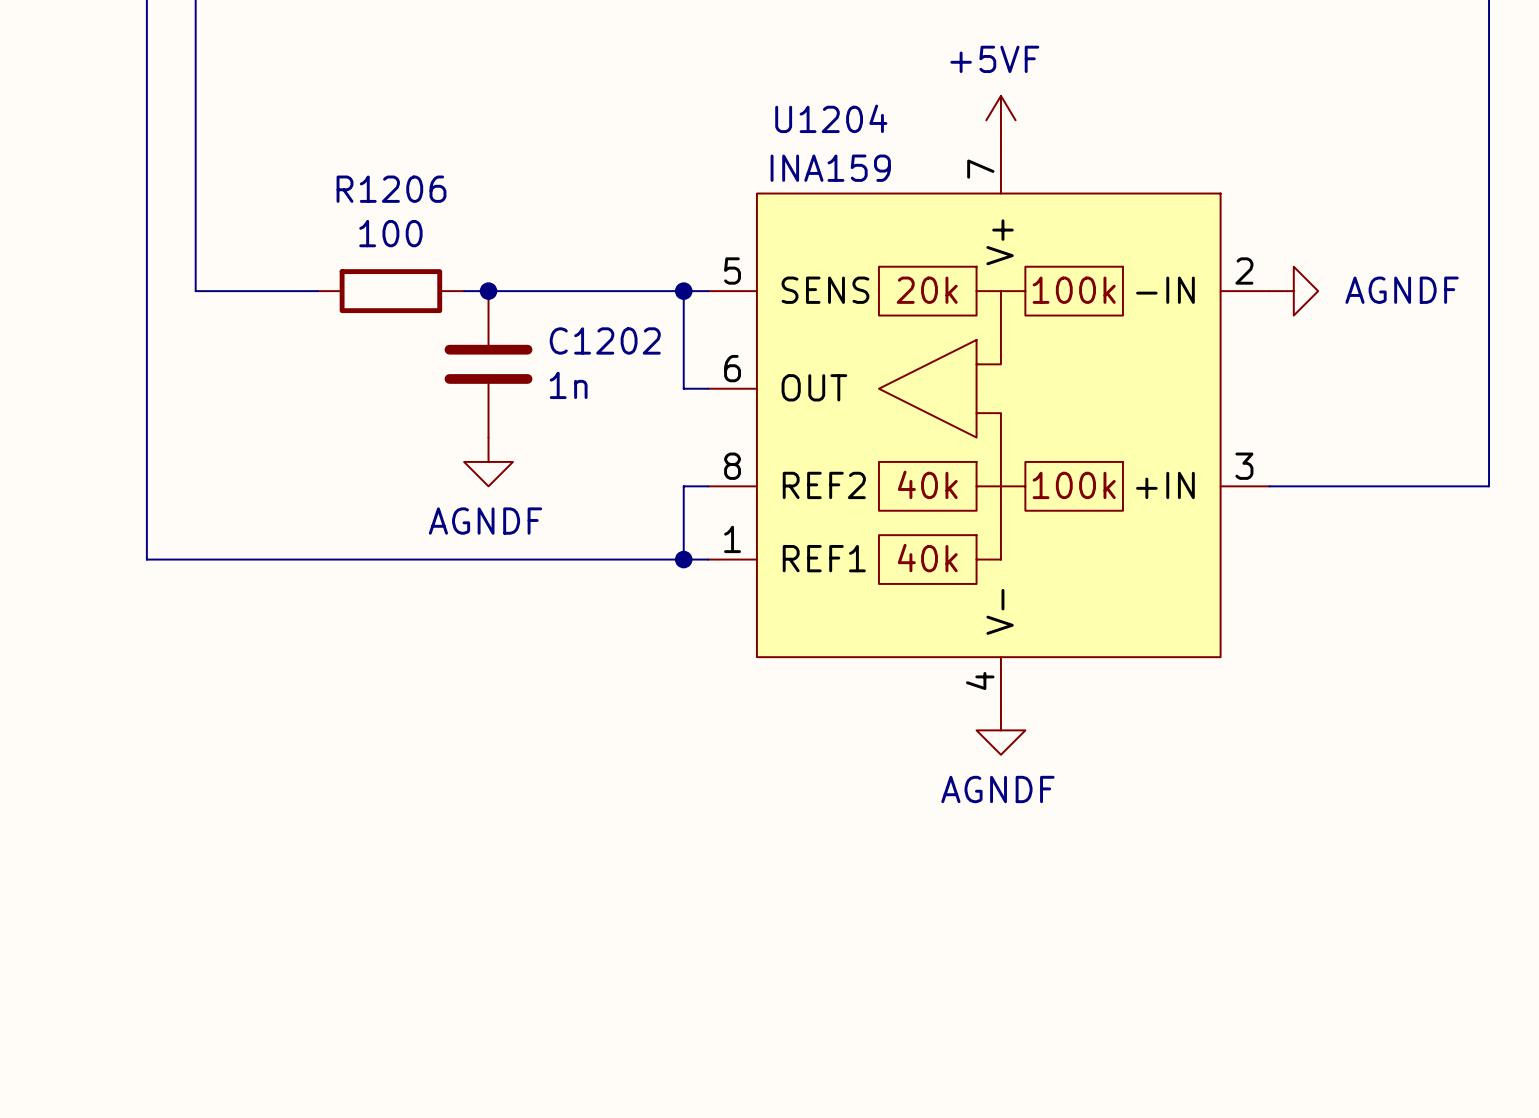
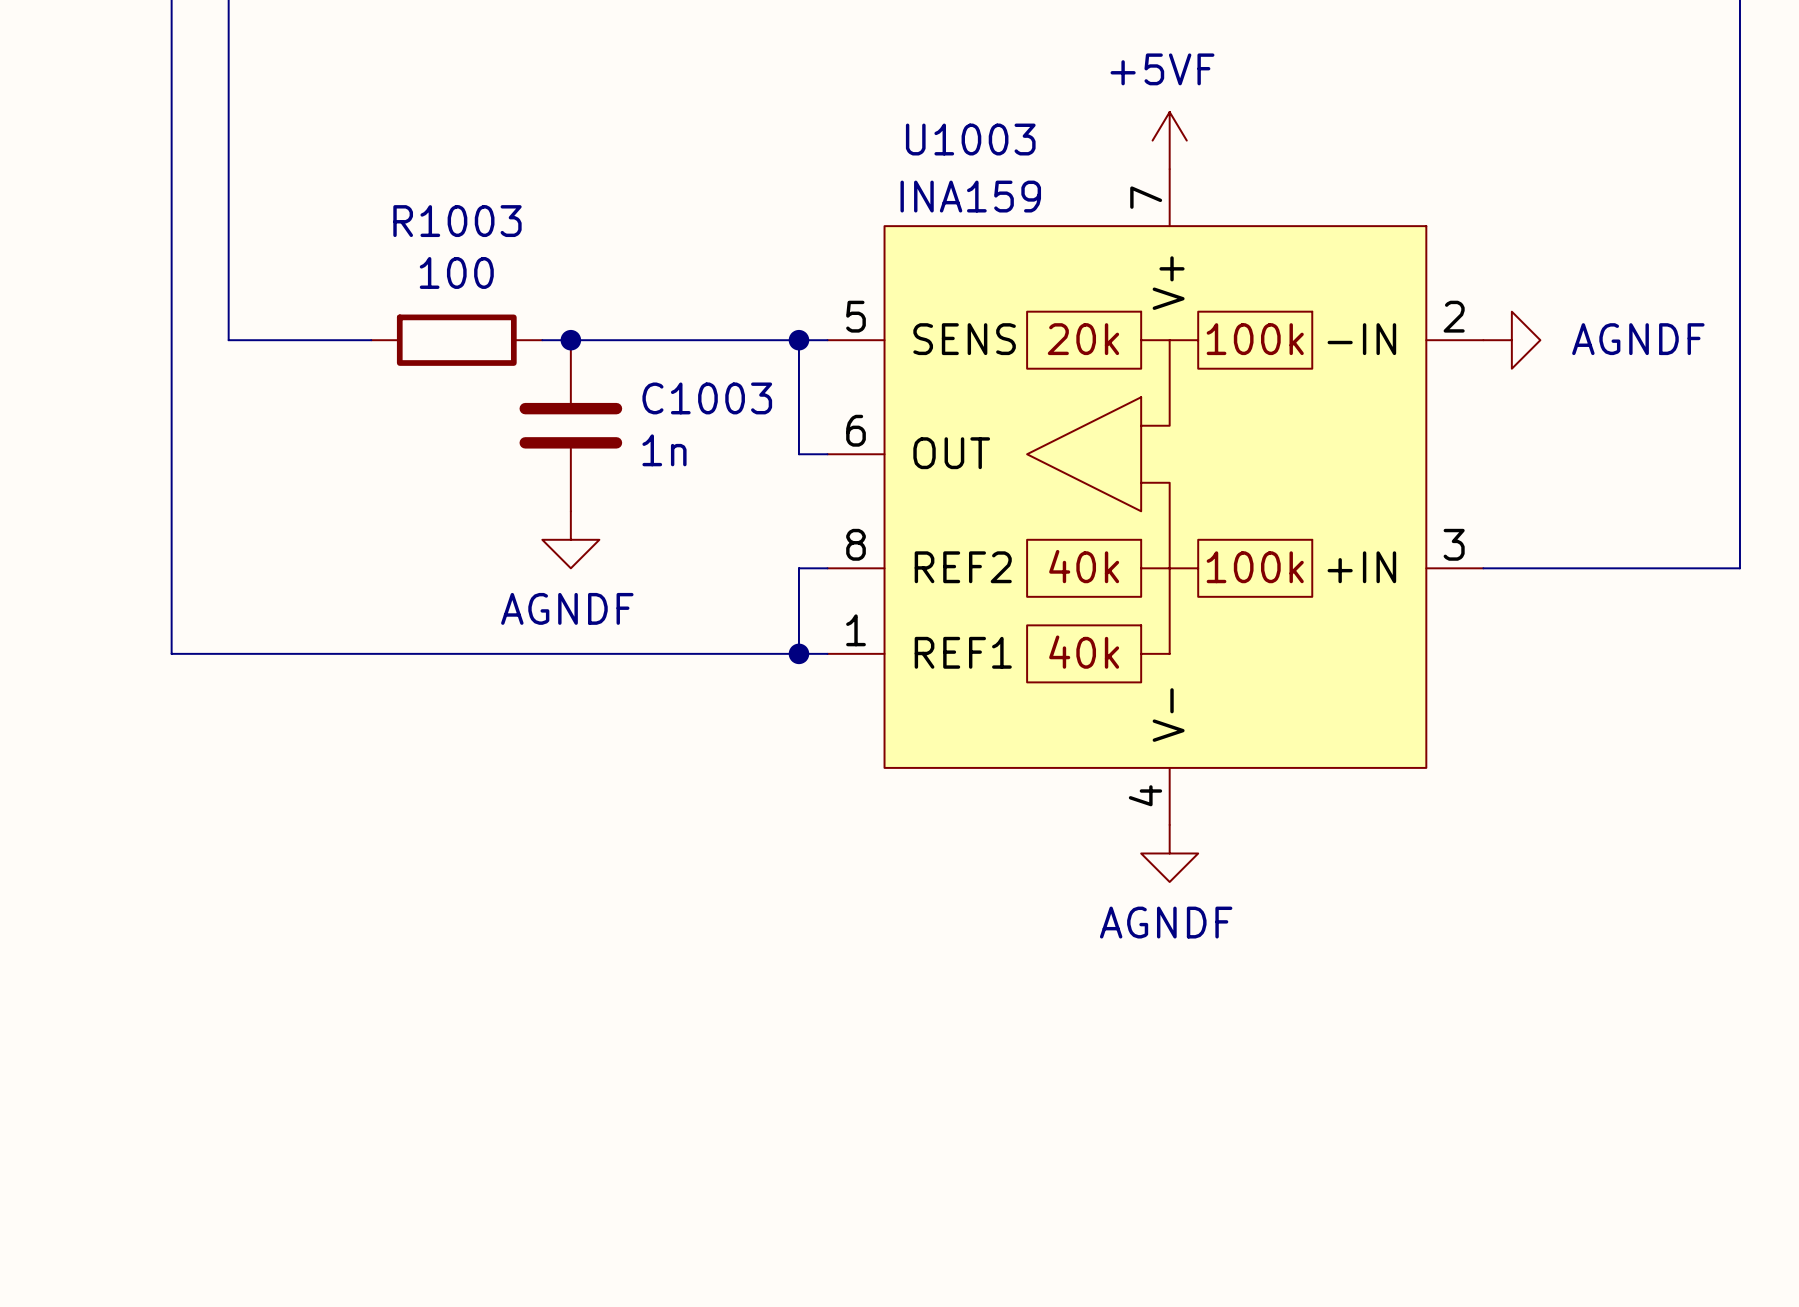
U1204 name: U1204 (831, 118) -> U1003 (970, 139)
R1206 name: R1206 (391, 189) -> R1003 (457, 221)
C1202 name: C1202 (605, 340) -> C1003 (707, 398)

